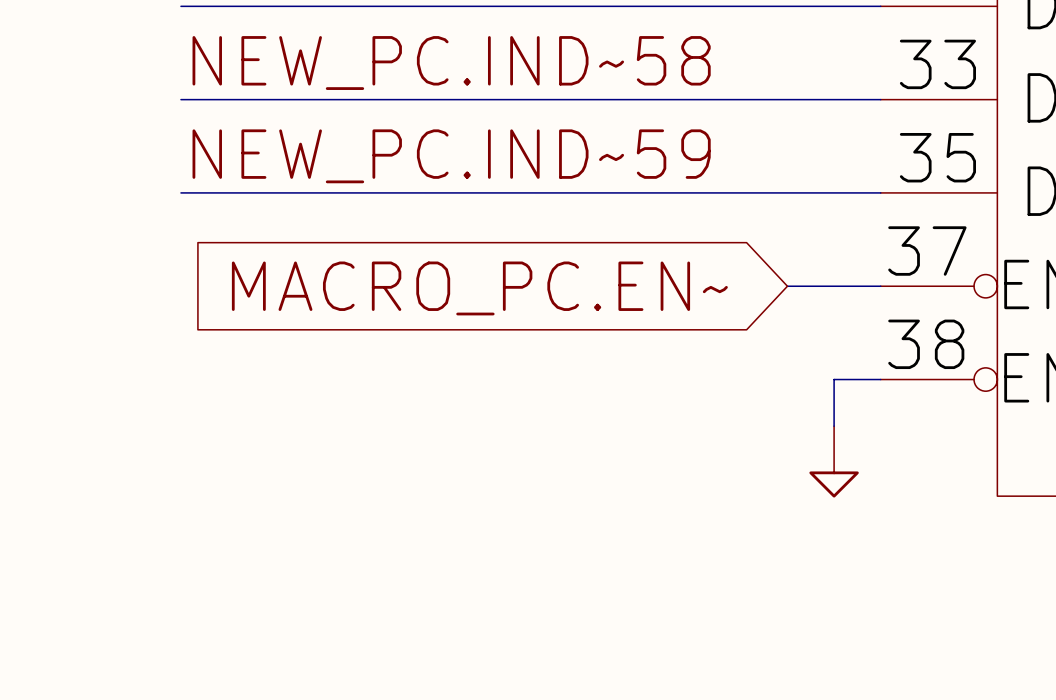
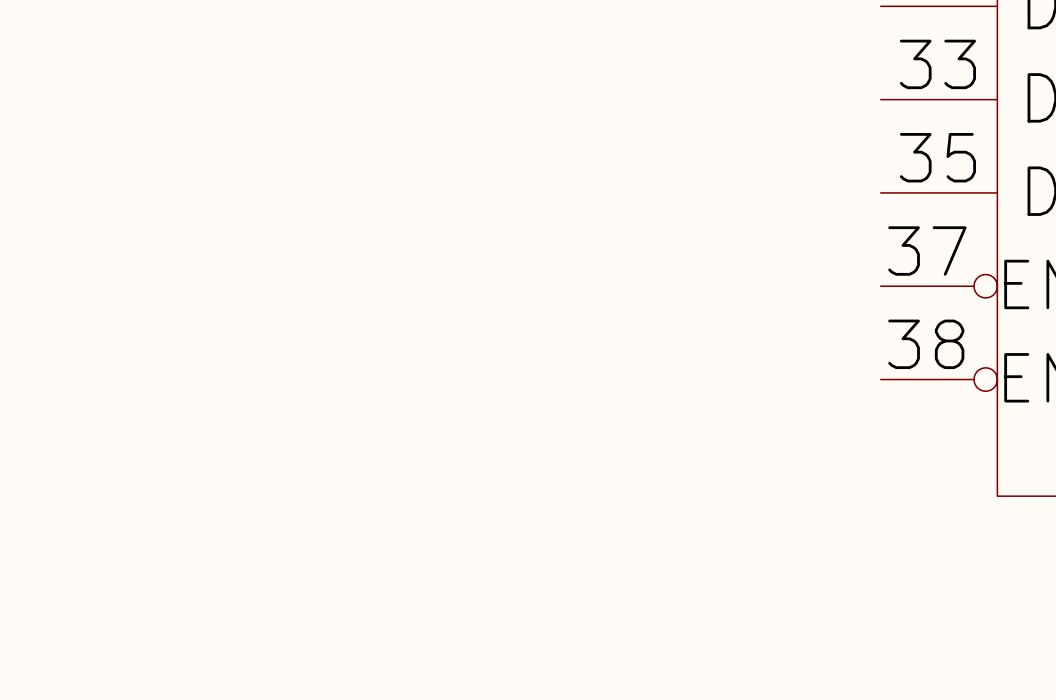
wire: (180, 6) (880, 6) -> none
label: NEW_PC.IND~58 (451, 63) -> none
wire: (180, 99) (880, 99) -> none
label: NEW_PC.IND~59 (451, 156) -> none
wire: (180, 192) (880, 192) -> none
wire: (787, 286) (880, 286) -> none
global label: MACRO_PC.EN~ (479, 288) -> none
wire: (880, 379) (834, 379) (834, 426) -> none
power symbol: (834, 461) -> none

